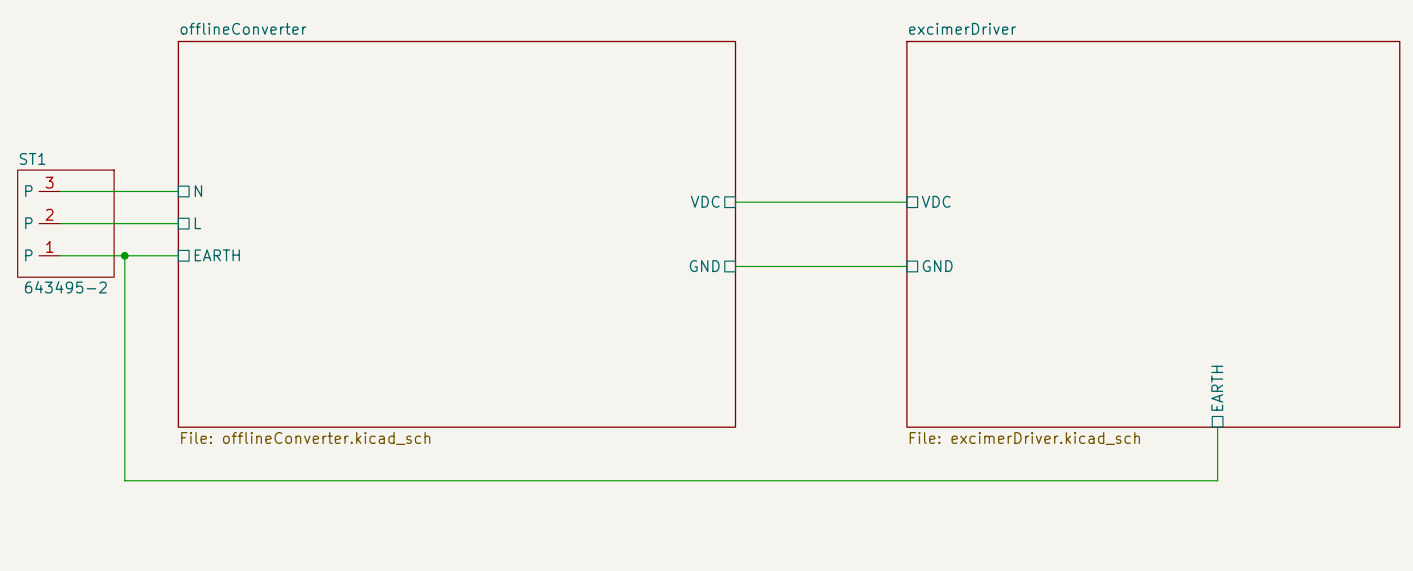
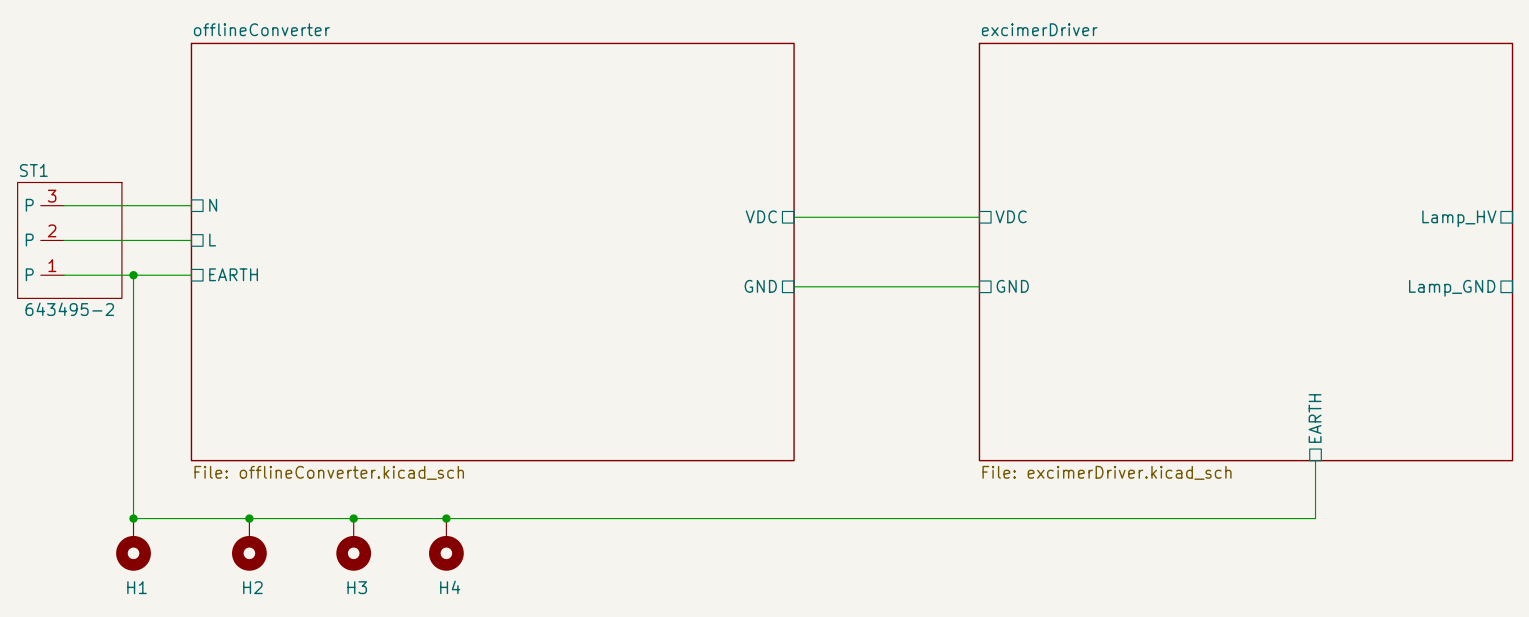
sheet pin: none -> Lamp_HV (1459, 218)
sheet pin: none -> Lamp_GND (1452, 288)
junction: none -> (133, 518)
junction: none -> (249, 518)
junction: none -> (353, 518)
junction: none -> (446, 518)
H1: none -> (133, 544)
H2: none -> (249, 544)
H3: none -> (353, 544)
H4: none -> (446, 544)

